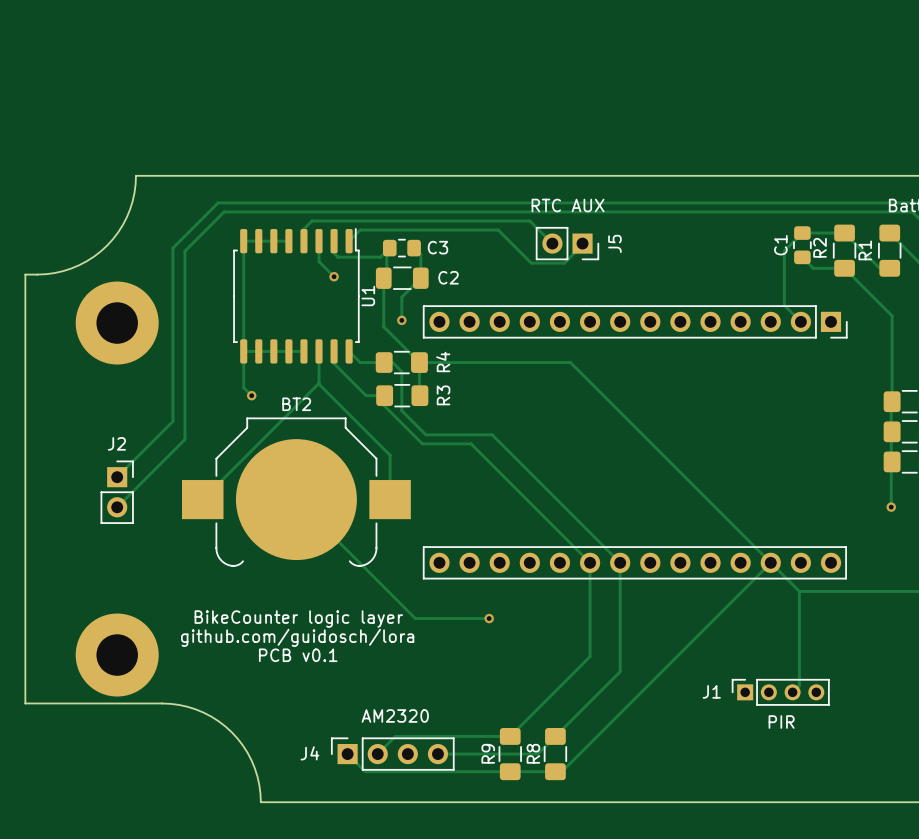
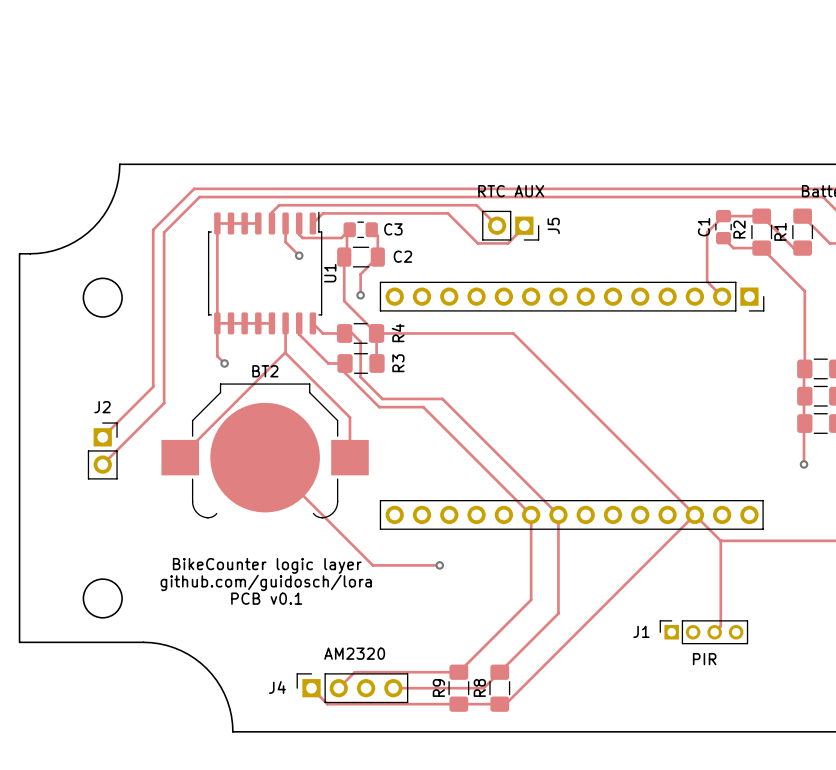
round board edge: none -> [82, 277, 123, 318]
part: (117, 323) -> none
round board edge: none -> [82, 578, 123, 619]
part: (117, 655) -> none

